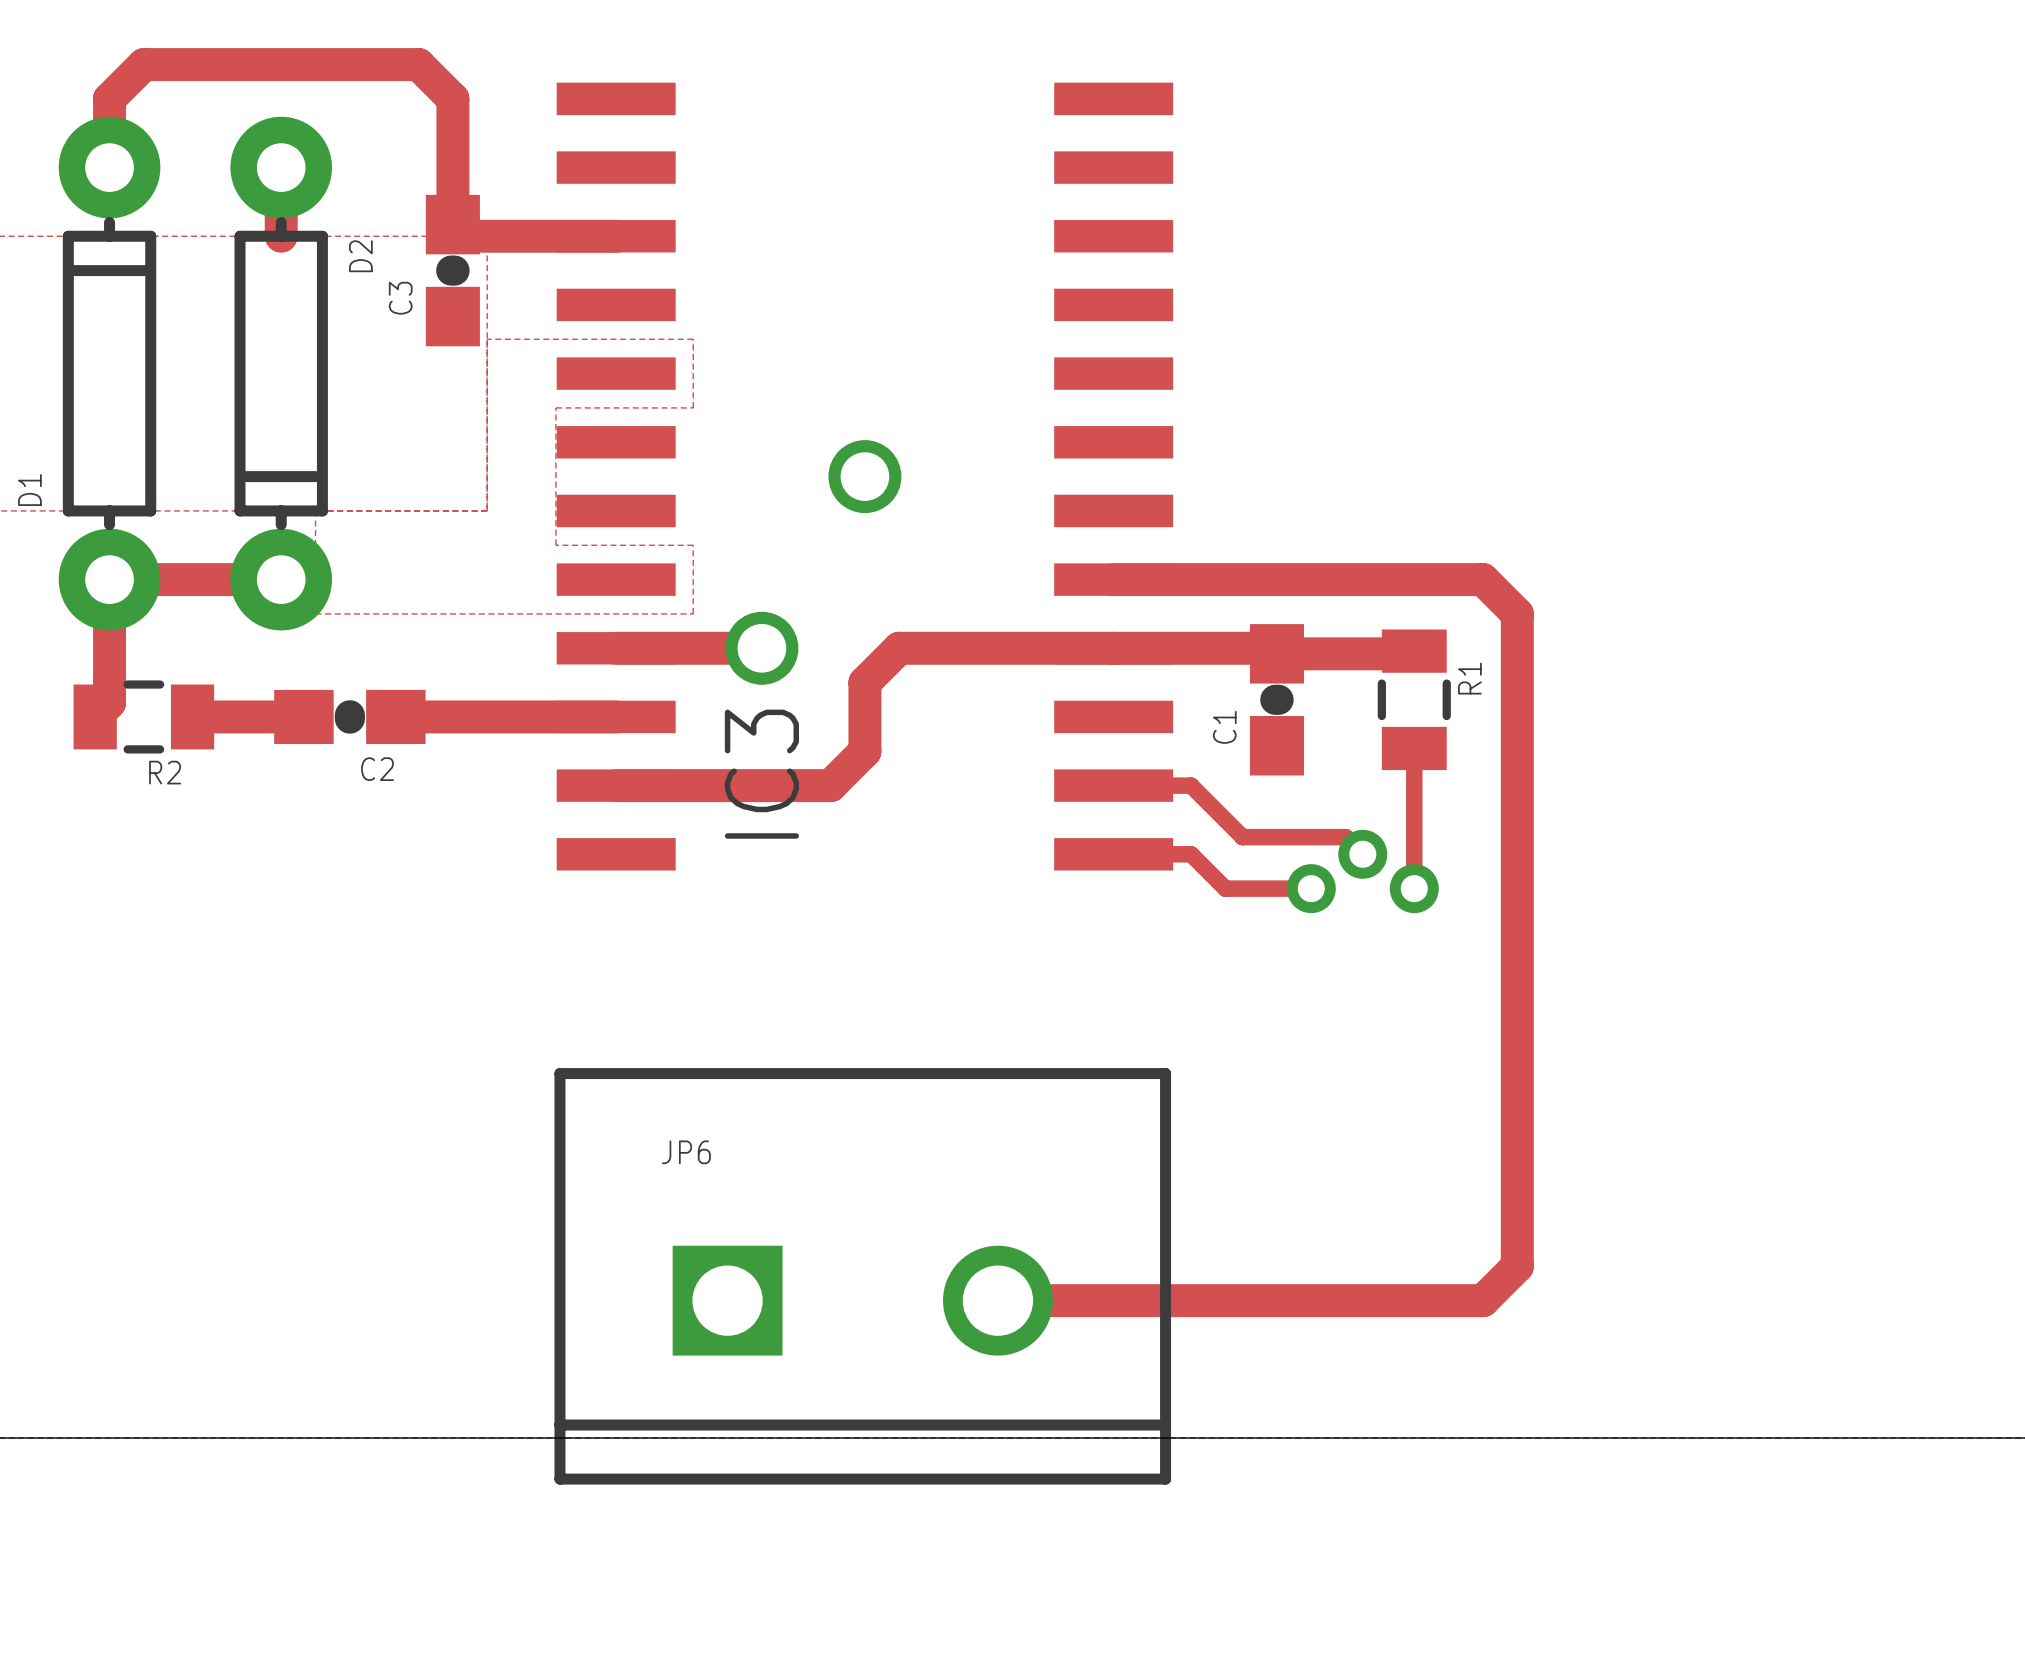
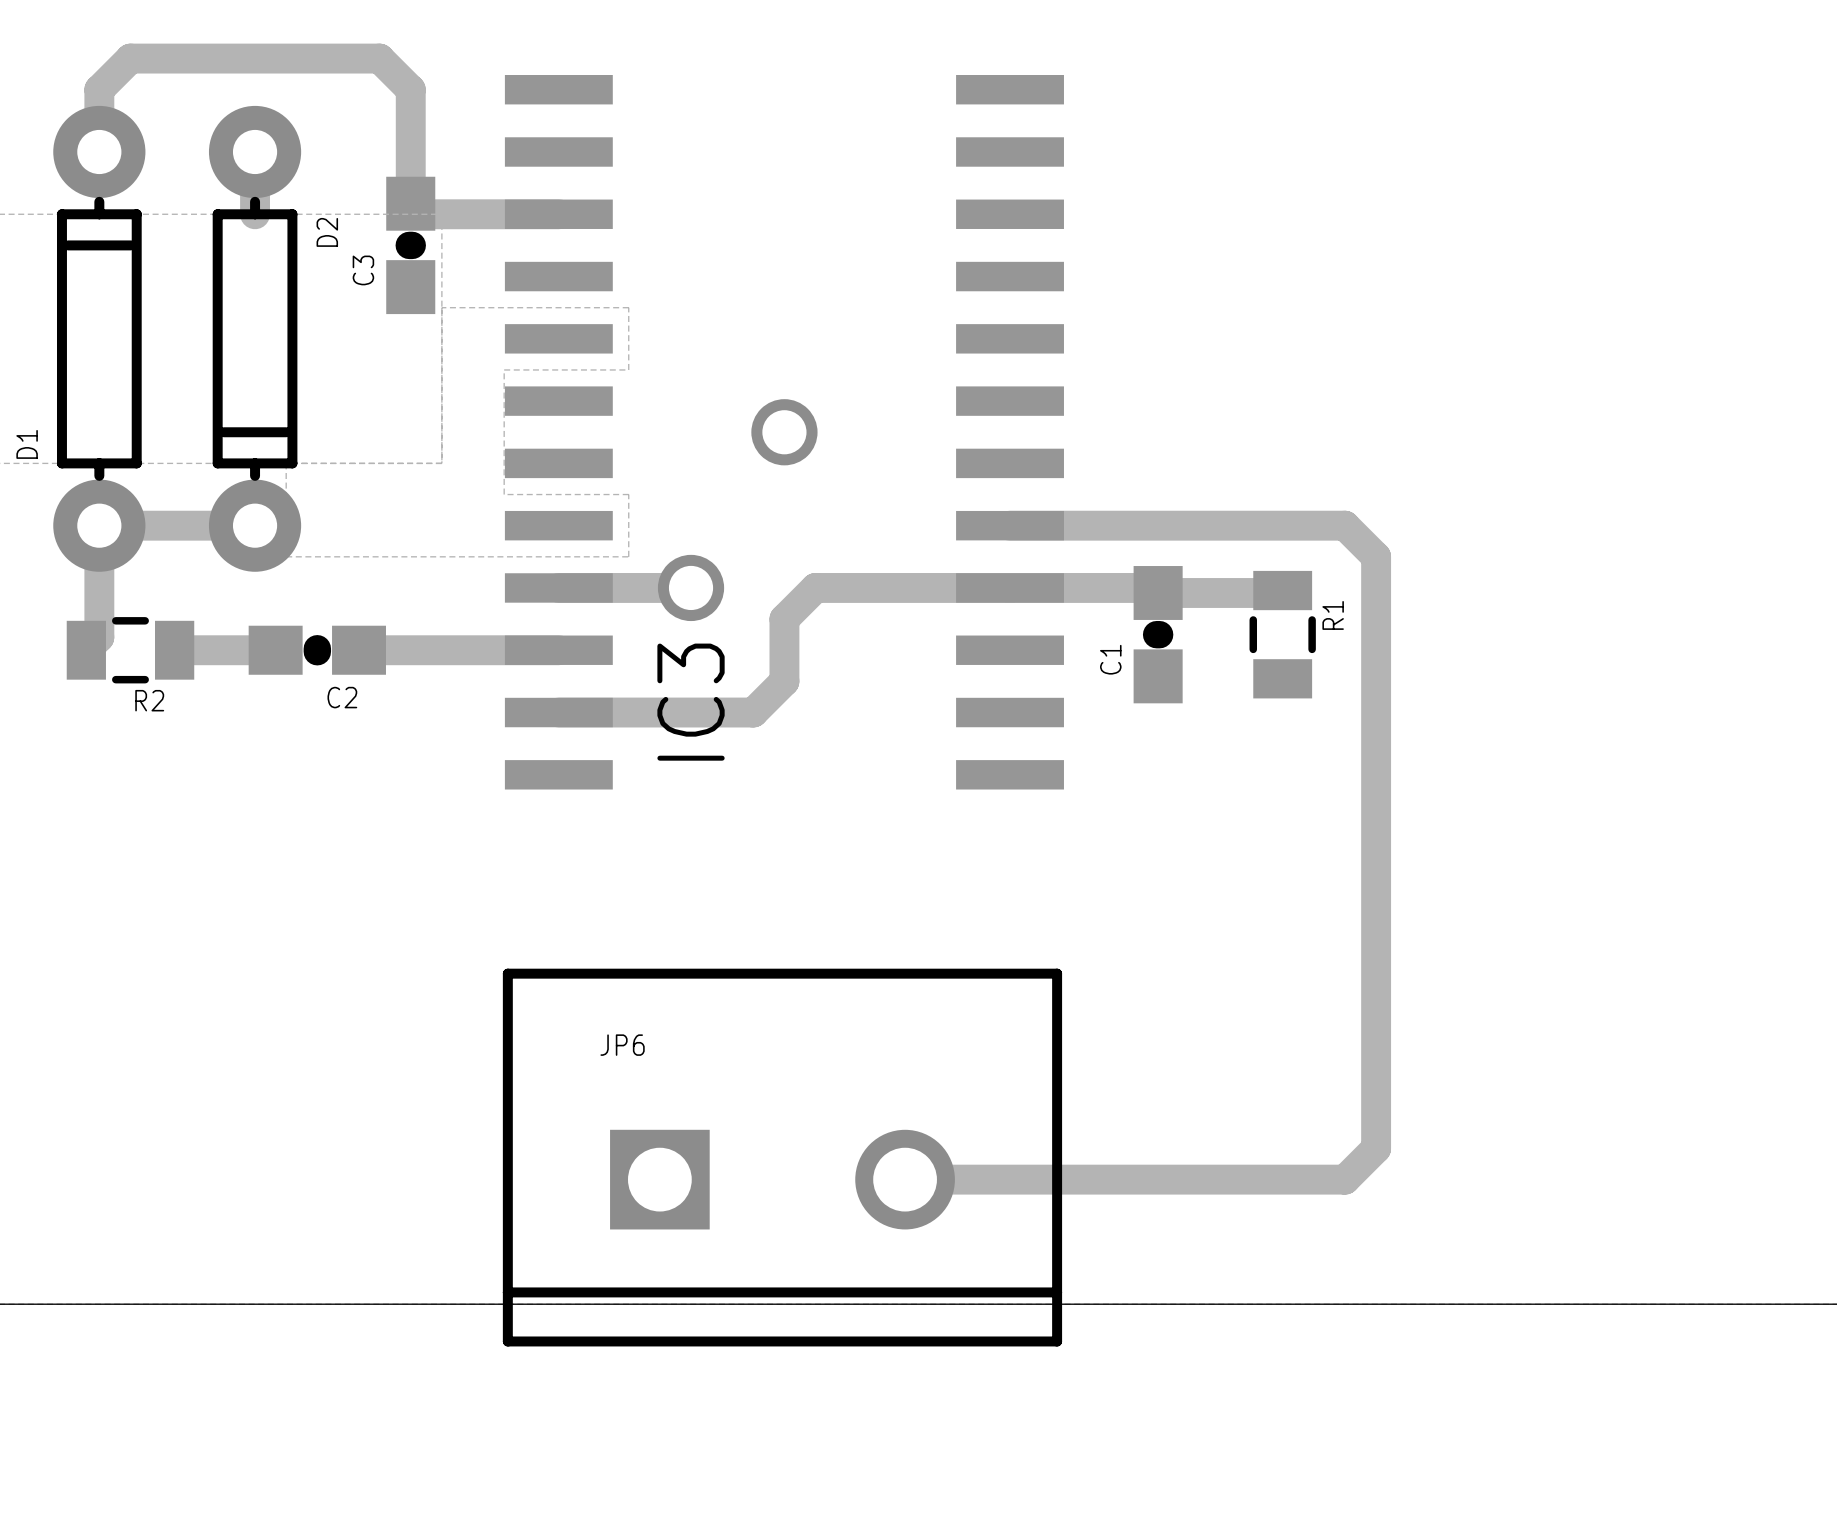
track: (1414, 748) (1414, 888) -> none
track: (1113, 785) (1191, 785) (1242, 837) (1345, 837) (1362, 854) -> none
track: (1113, 854) (1191, 854) (1225, 888) (1311, 888) -> none
via: (1362, 854) -> none
via: (1311, 888) -> none
via: (1414, 888) -> none

